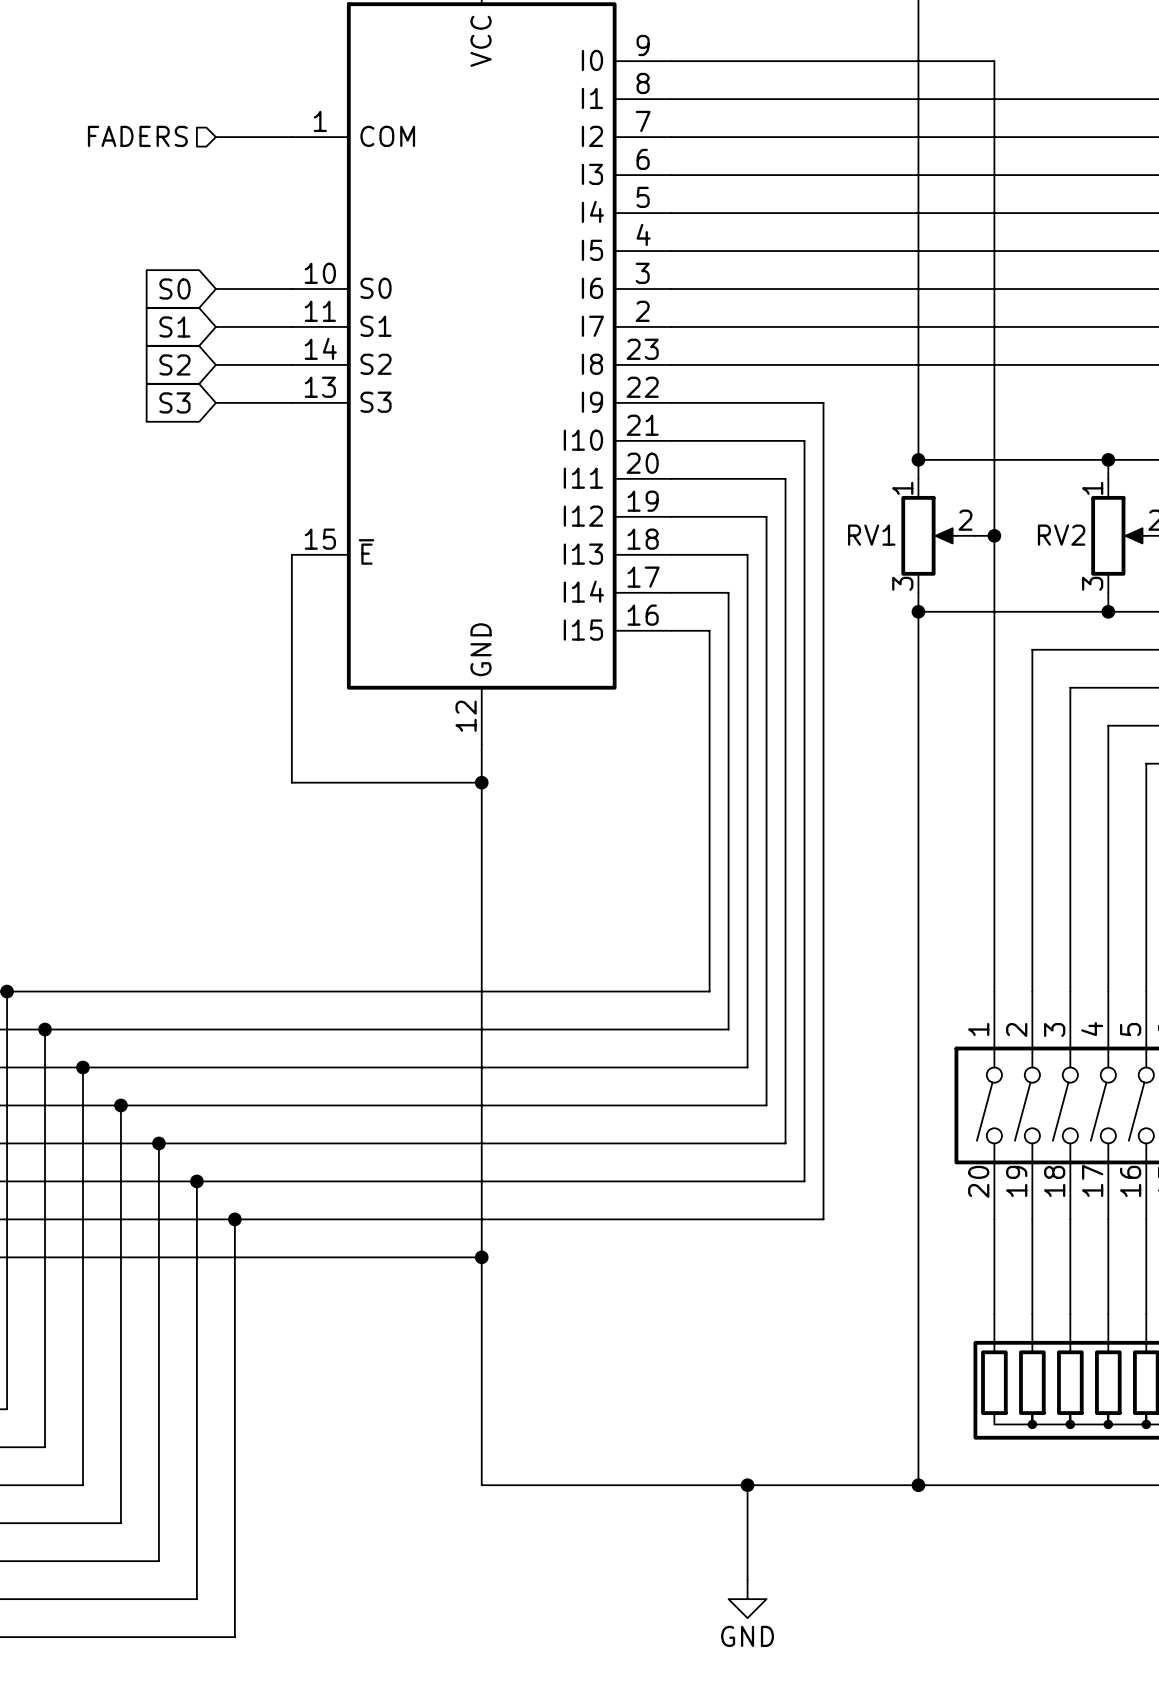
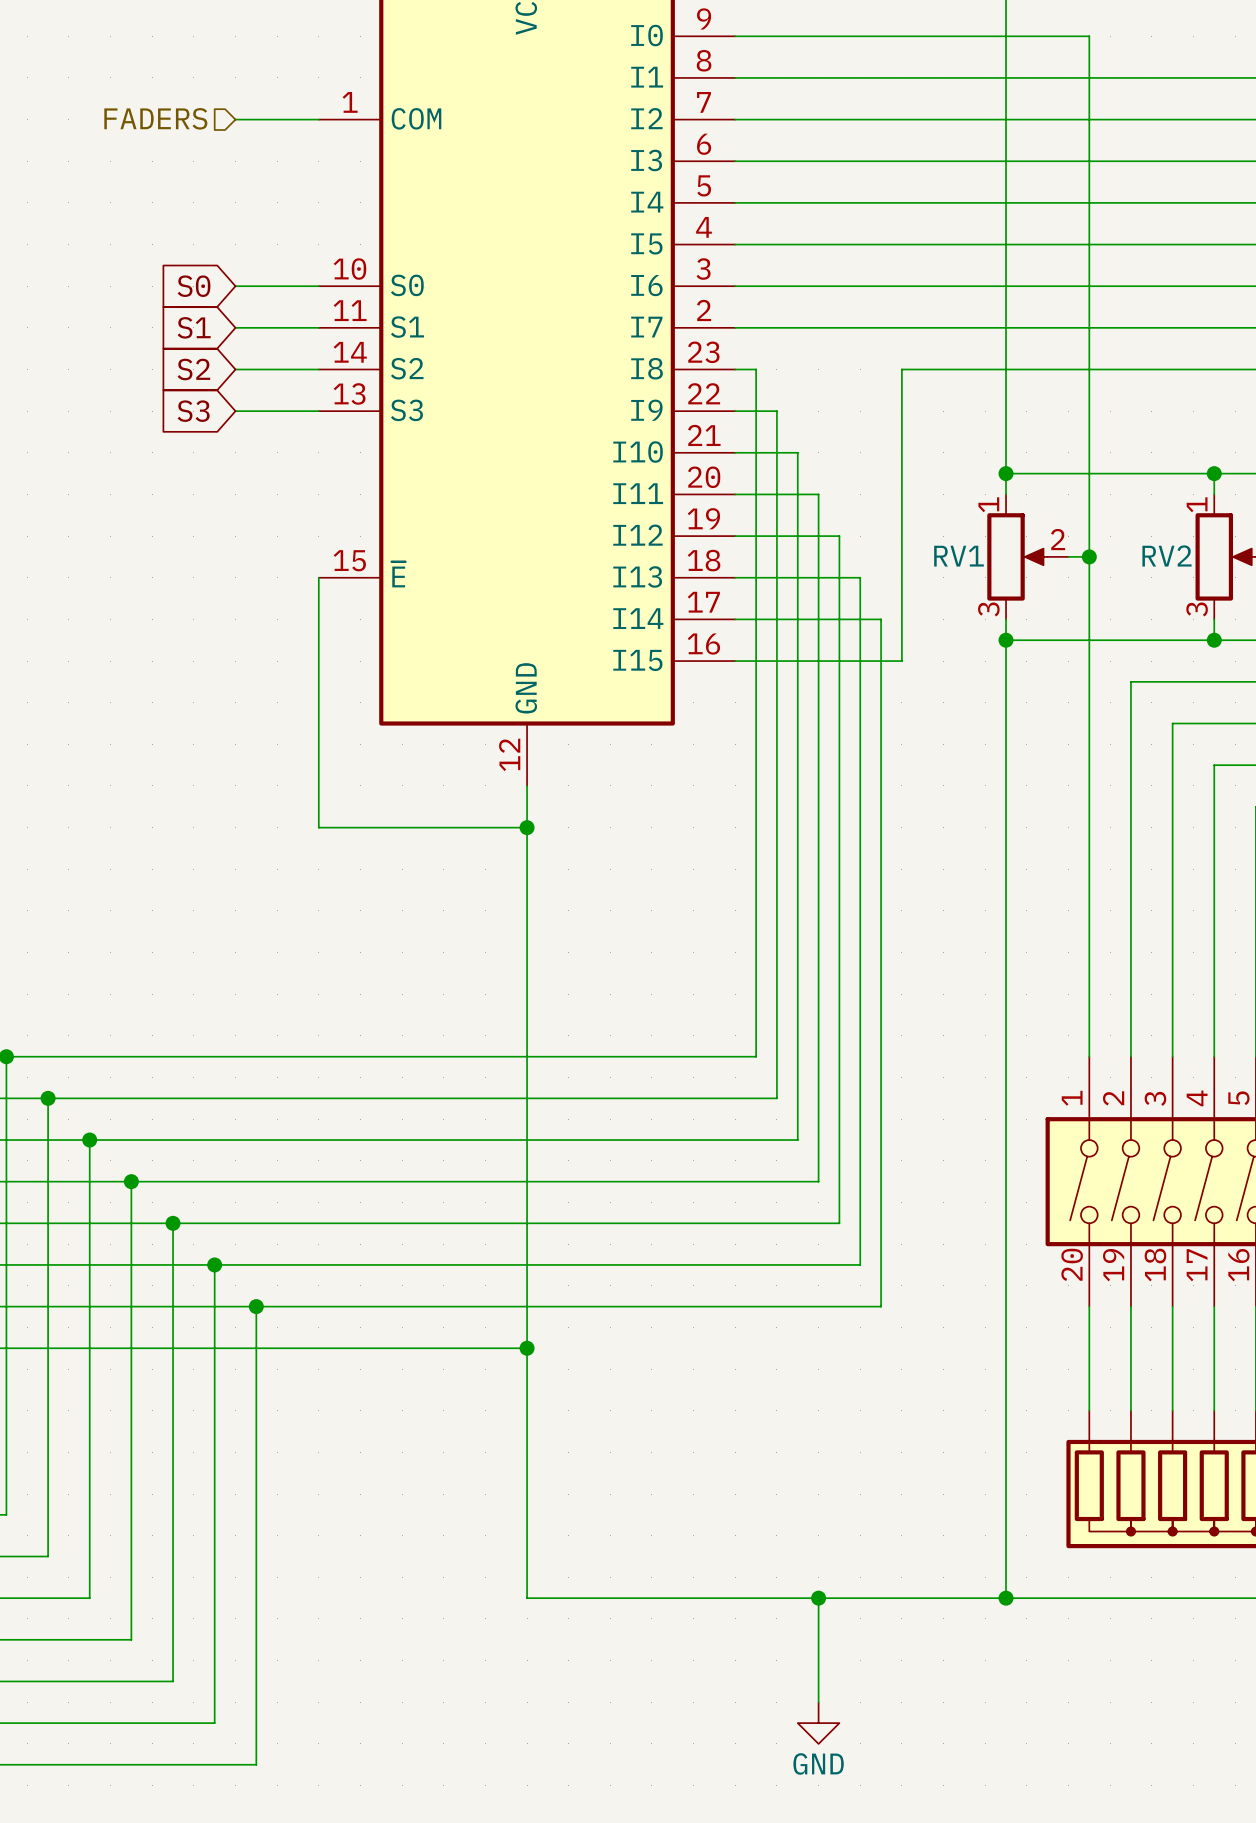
wire: (690, 364) (823, 364) -> none
wire: (709, 402) (823, 402) -> (901, 369) (901, 411)
wire: none -> (776, 411) (776, 661) (901, 661)
wire: (728, 440) (804, 440) (804, 592) -> (797, 452) (797, 619) (881, 619)
wire: (747, 478) (785, 478) (785, 554) -> (818, 494) (818, 577) (860, 577)
wire: (823, 630) (823, 1219) (804, 1219) -> (881, 1264) (881, 1306)
wire: (690, 991) (709, 991) -> (756, 1056) (756, 369)
wire: (709, 1029) (728, 1029) -> (776, 1098) (776, 1056)
wire: (728, 1067) (747, 1067) -> (797, 1140) (797, 1098)
wire: (747, 1105) (766, 1105) -> (818, 1181) (818, 1140)
wire: (766, 1143) (785, 1143) -> (839, 1223) (839, 1181)
wire: (785, 1181) (804, 1181) -> (860, 1264) (860, 1223)

